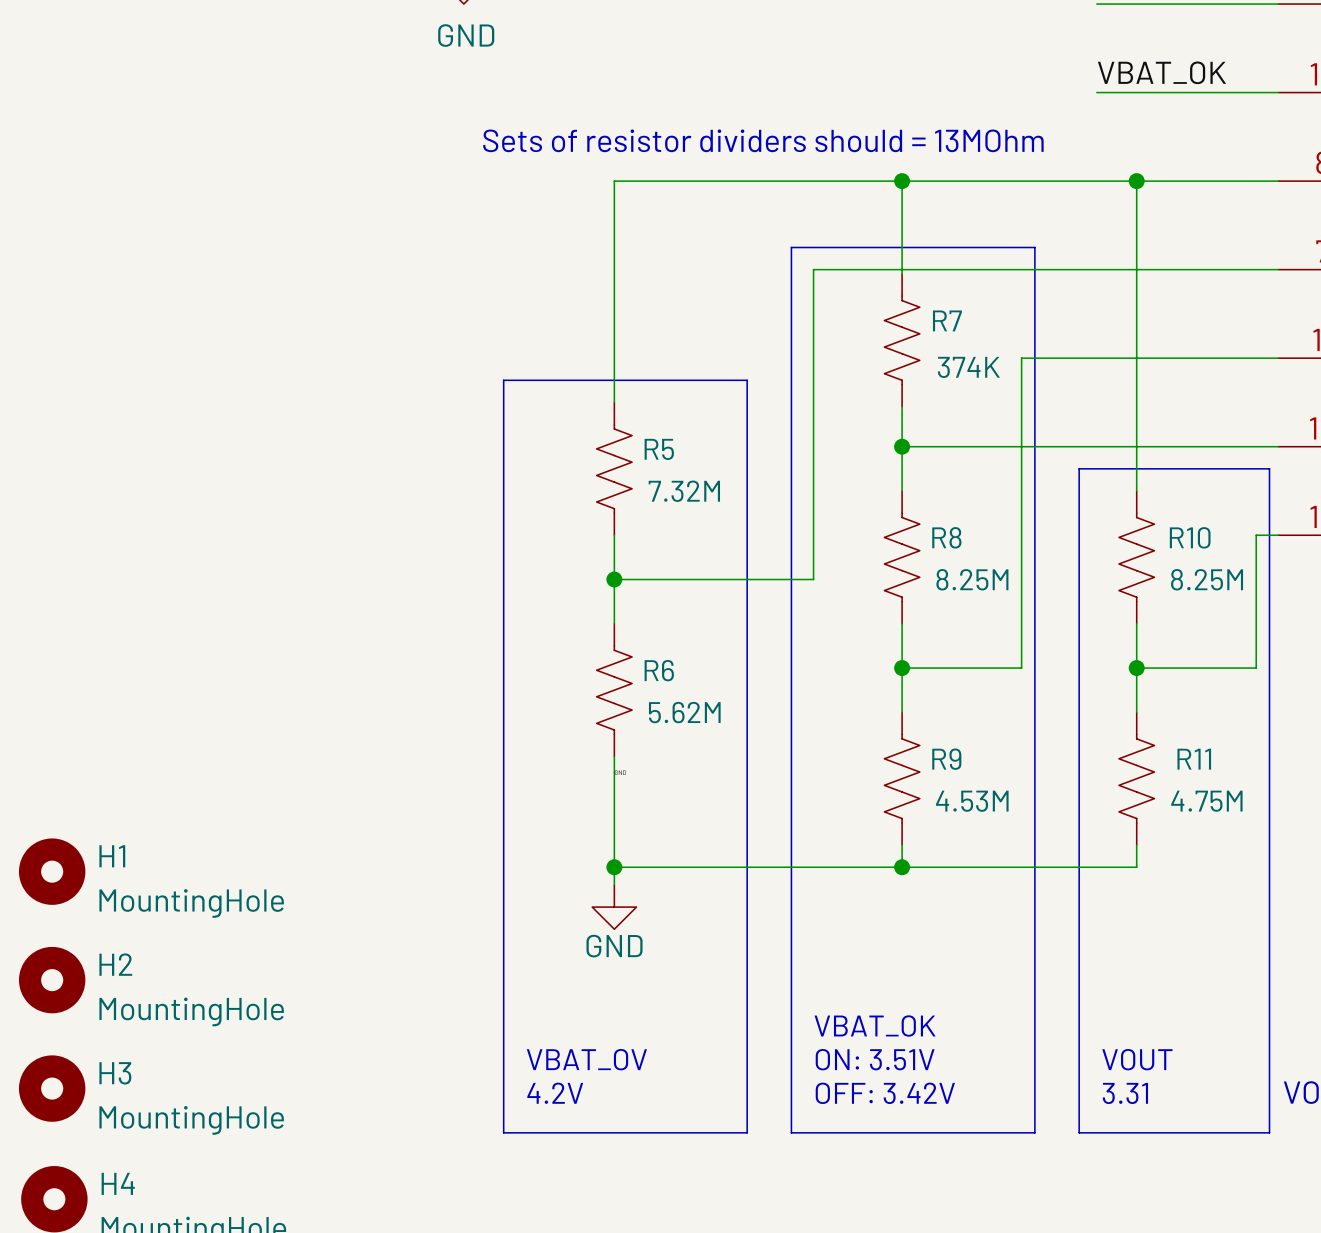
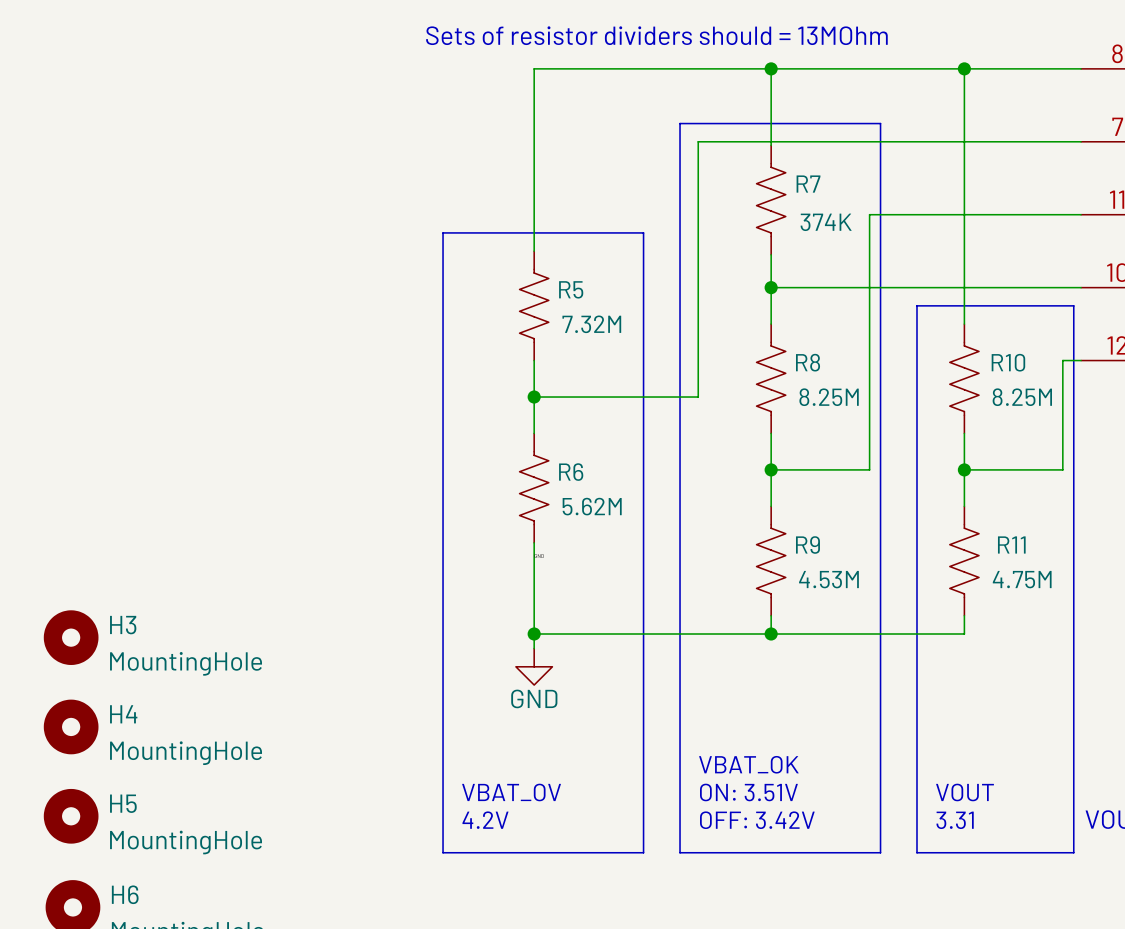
H1 name: H1 (112, 856) -> H3 (123, 625)
H2 name: H2 (115, 964) -> H4 (123, 714)
H3 name: H3 (115, 1073) -> H5 (123, 803)
H4 name: H4 (118, 1183) -> H6 (125, 894)

